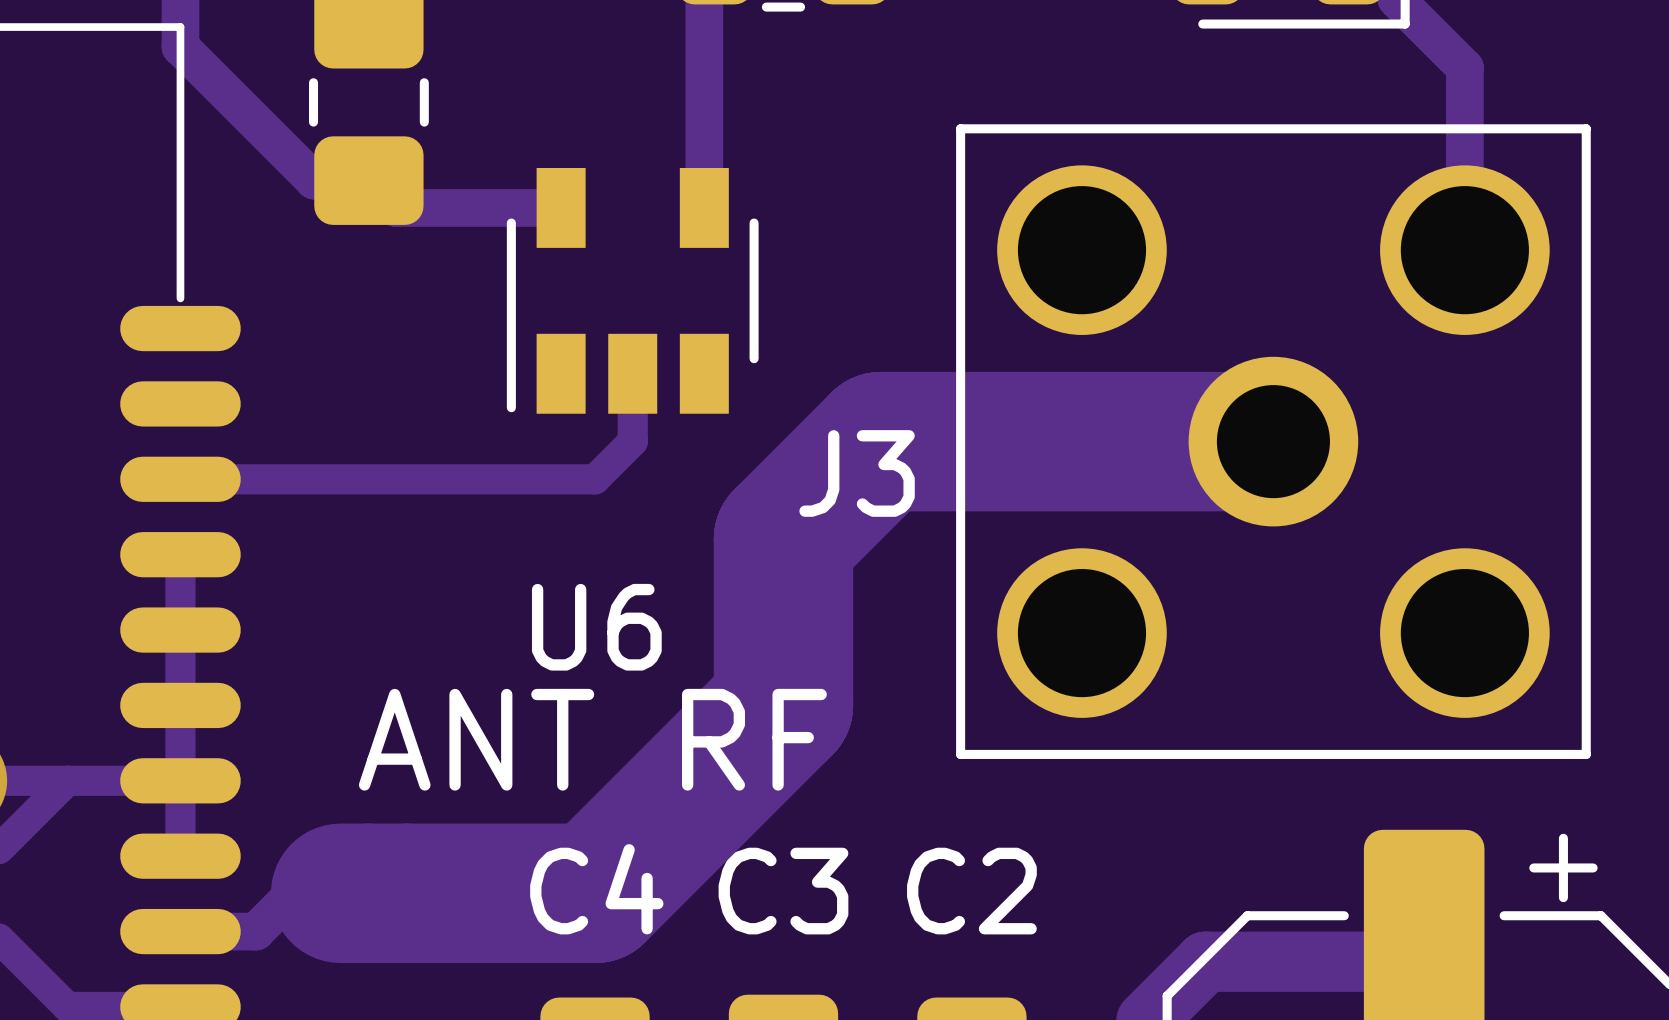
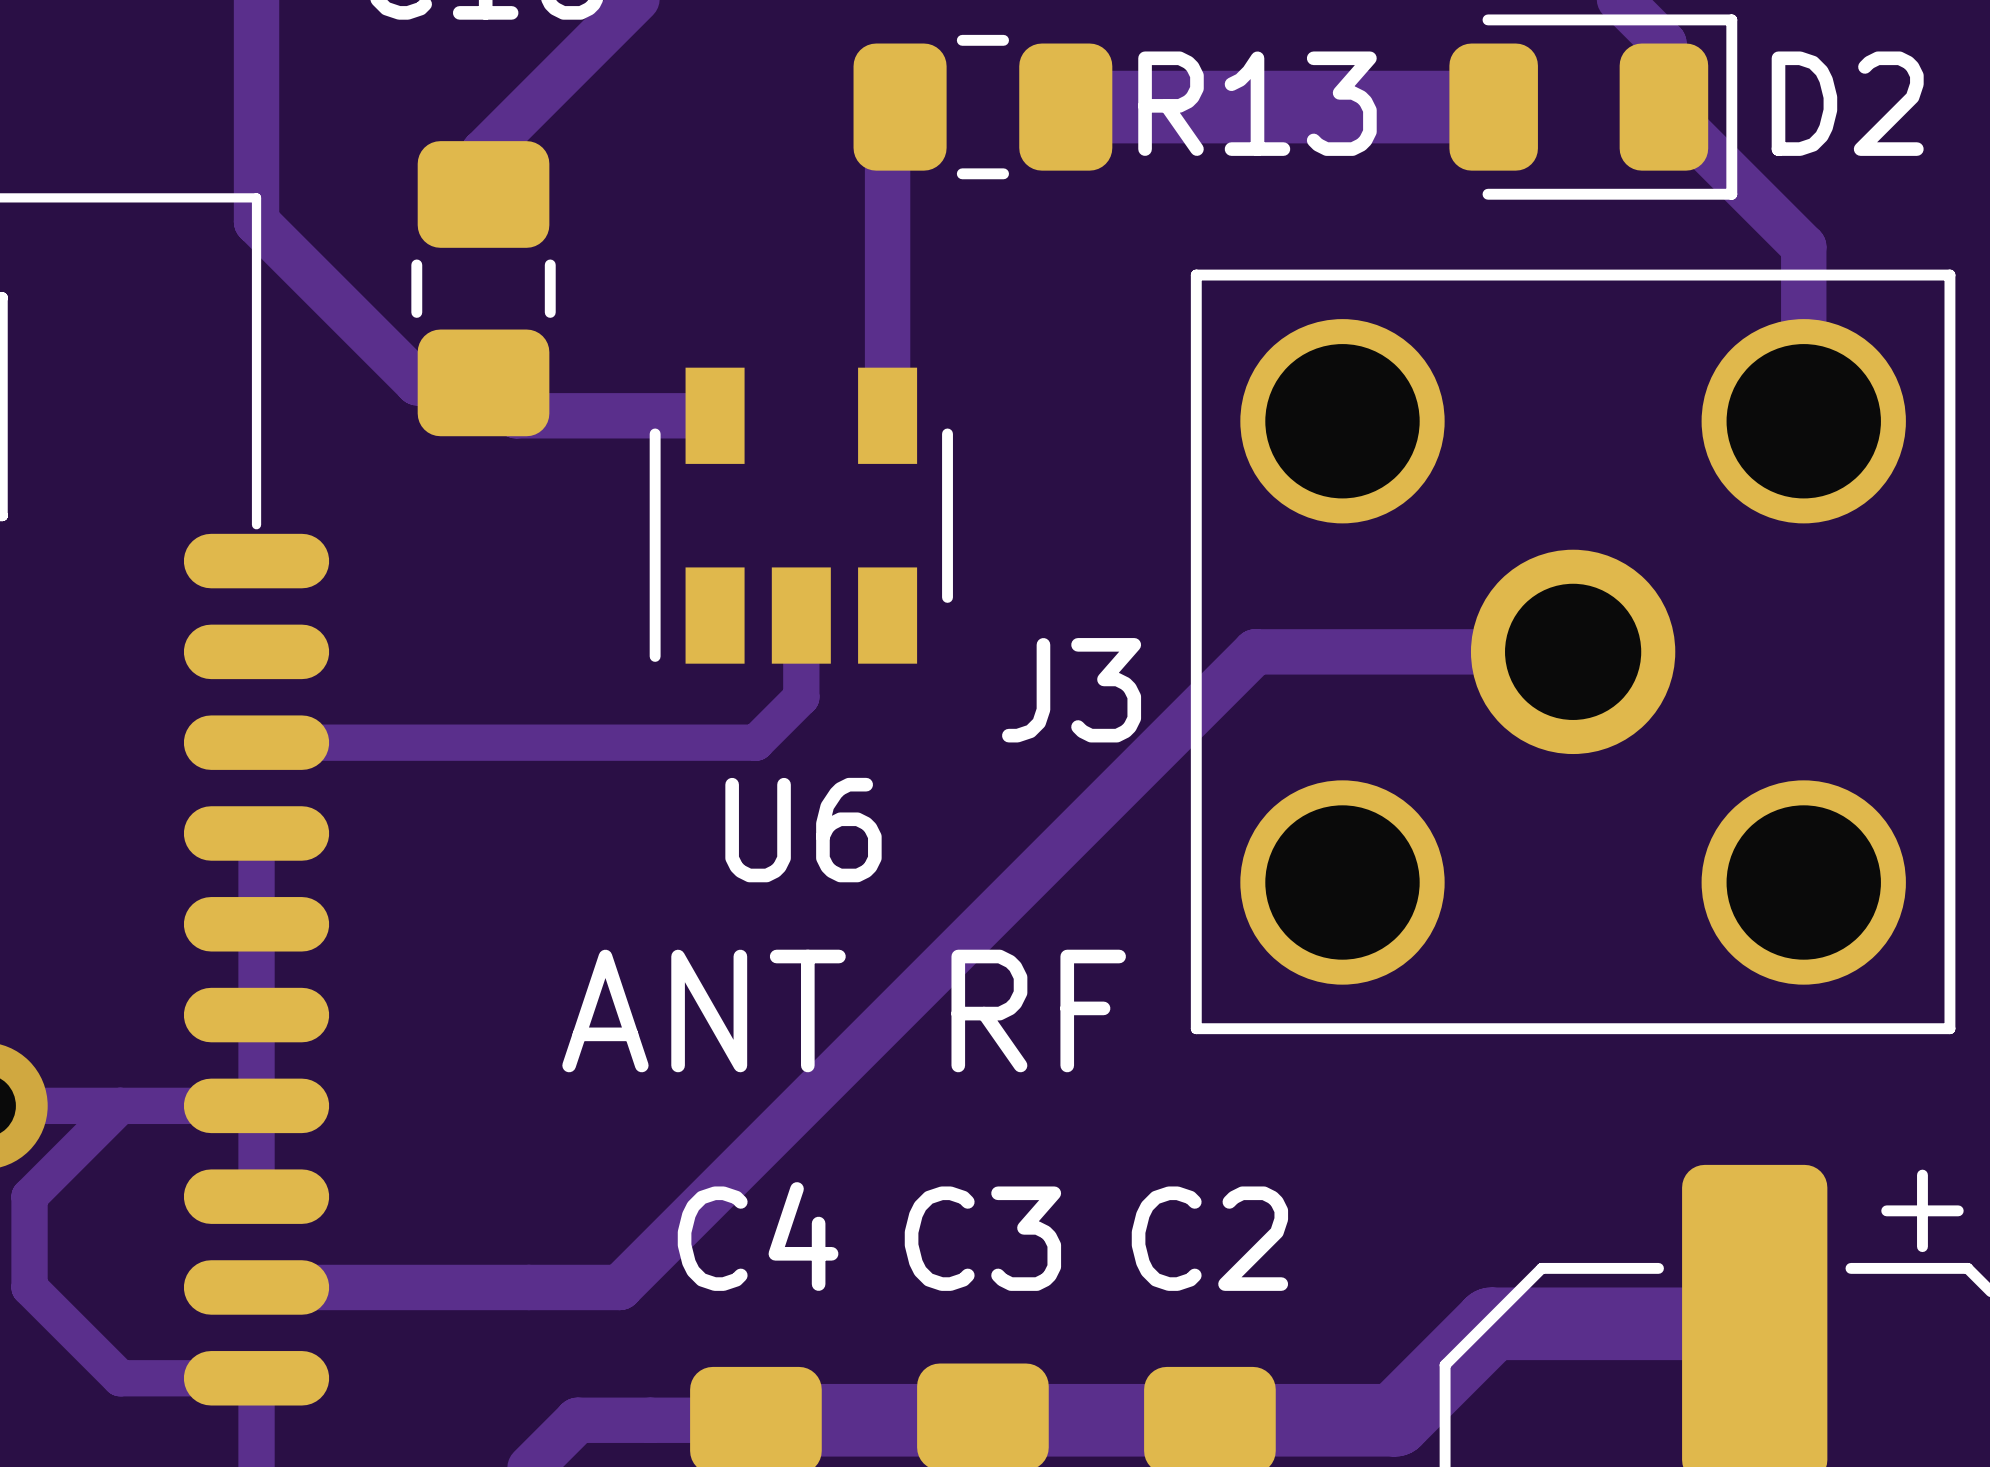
J3 position: (1273, 441) -> (1573, 651)
track: (1258, 456) (1273, 441) (880, 441) (783, 538) (783, 705) (595, 893) (340, 893) -> none
U6 name position: U6 (596, 627) -> U6 (803, 830)
text position: ANT RF (592, 739) -> ANT RF (844, 1011)
track: (294, 893) (255, 931) -> (1573, 651) (1255, 651) (619, 1287) (347, 1287)

